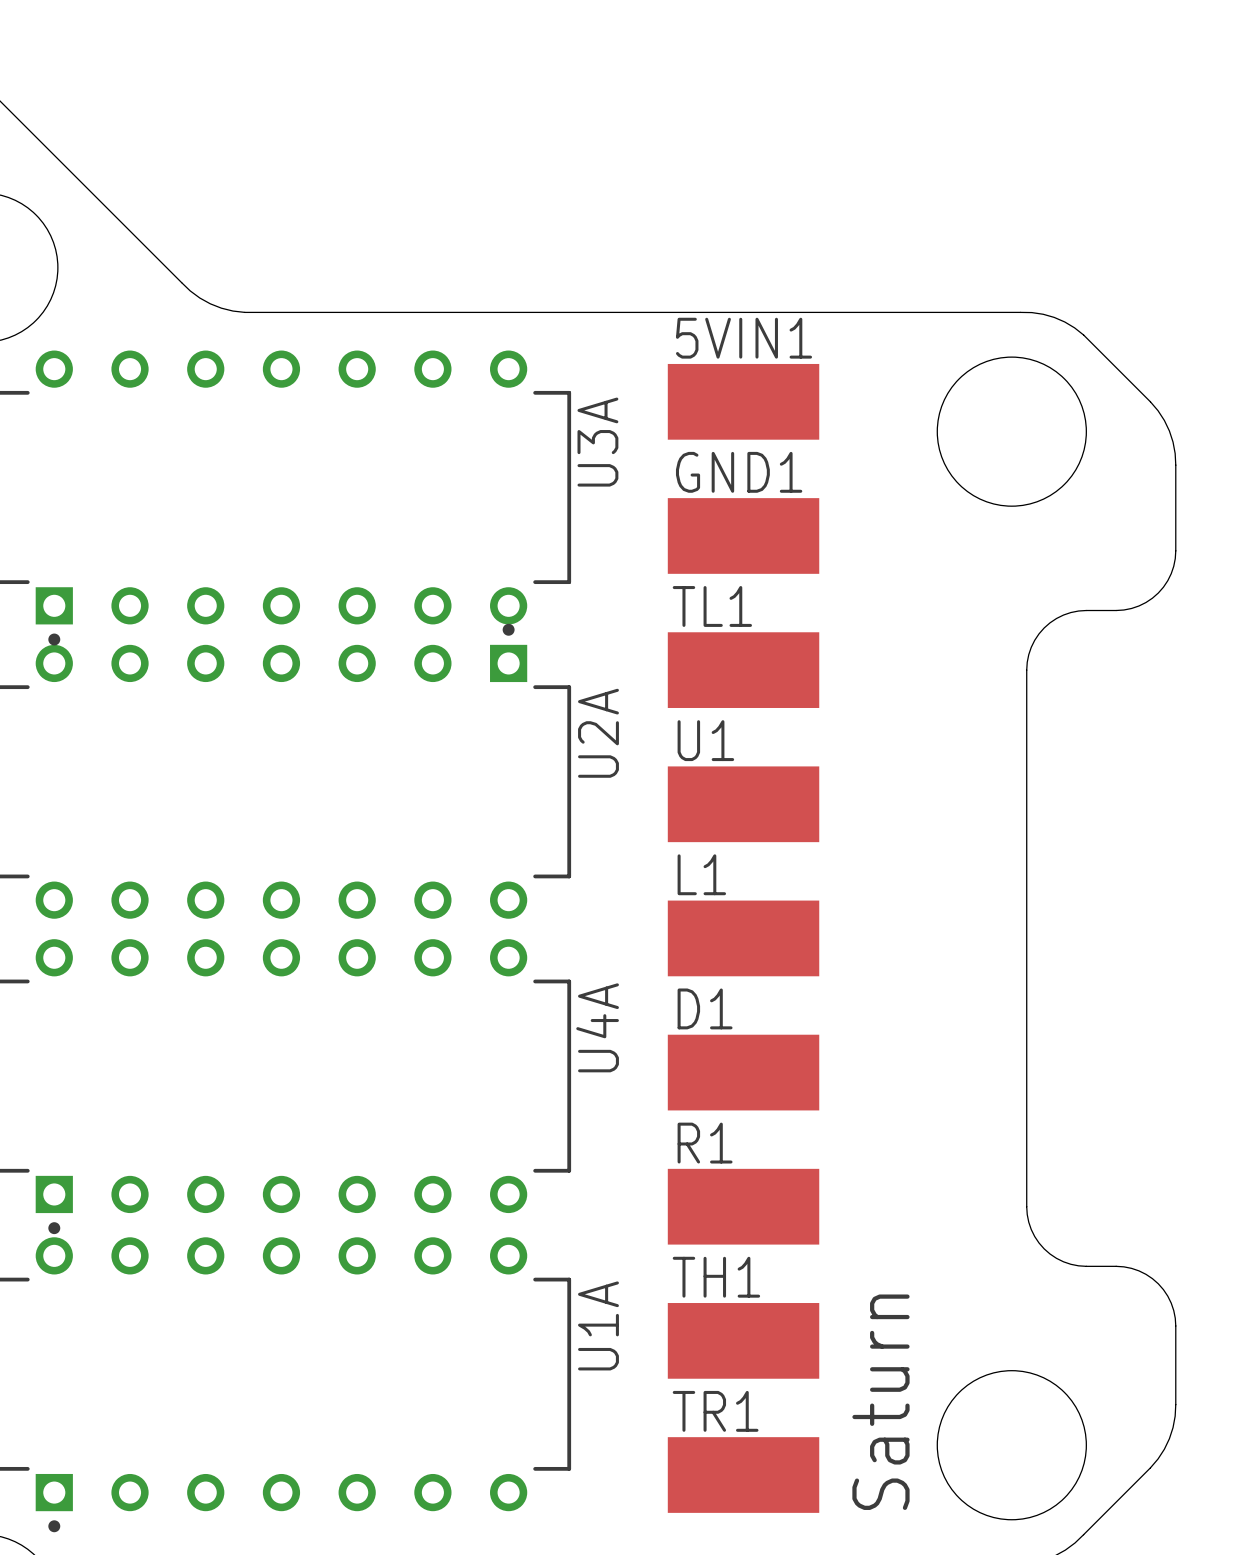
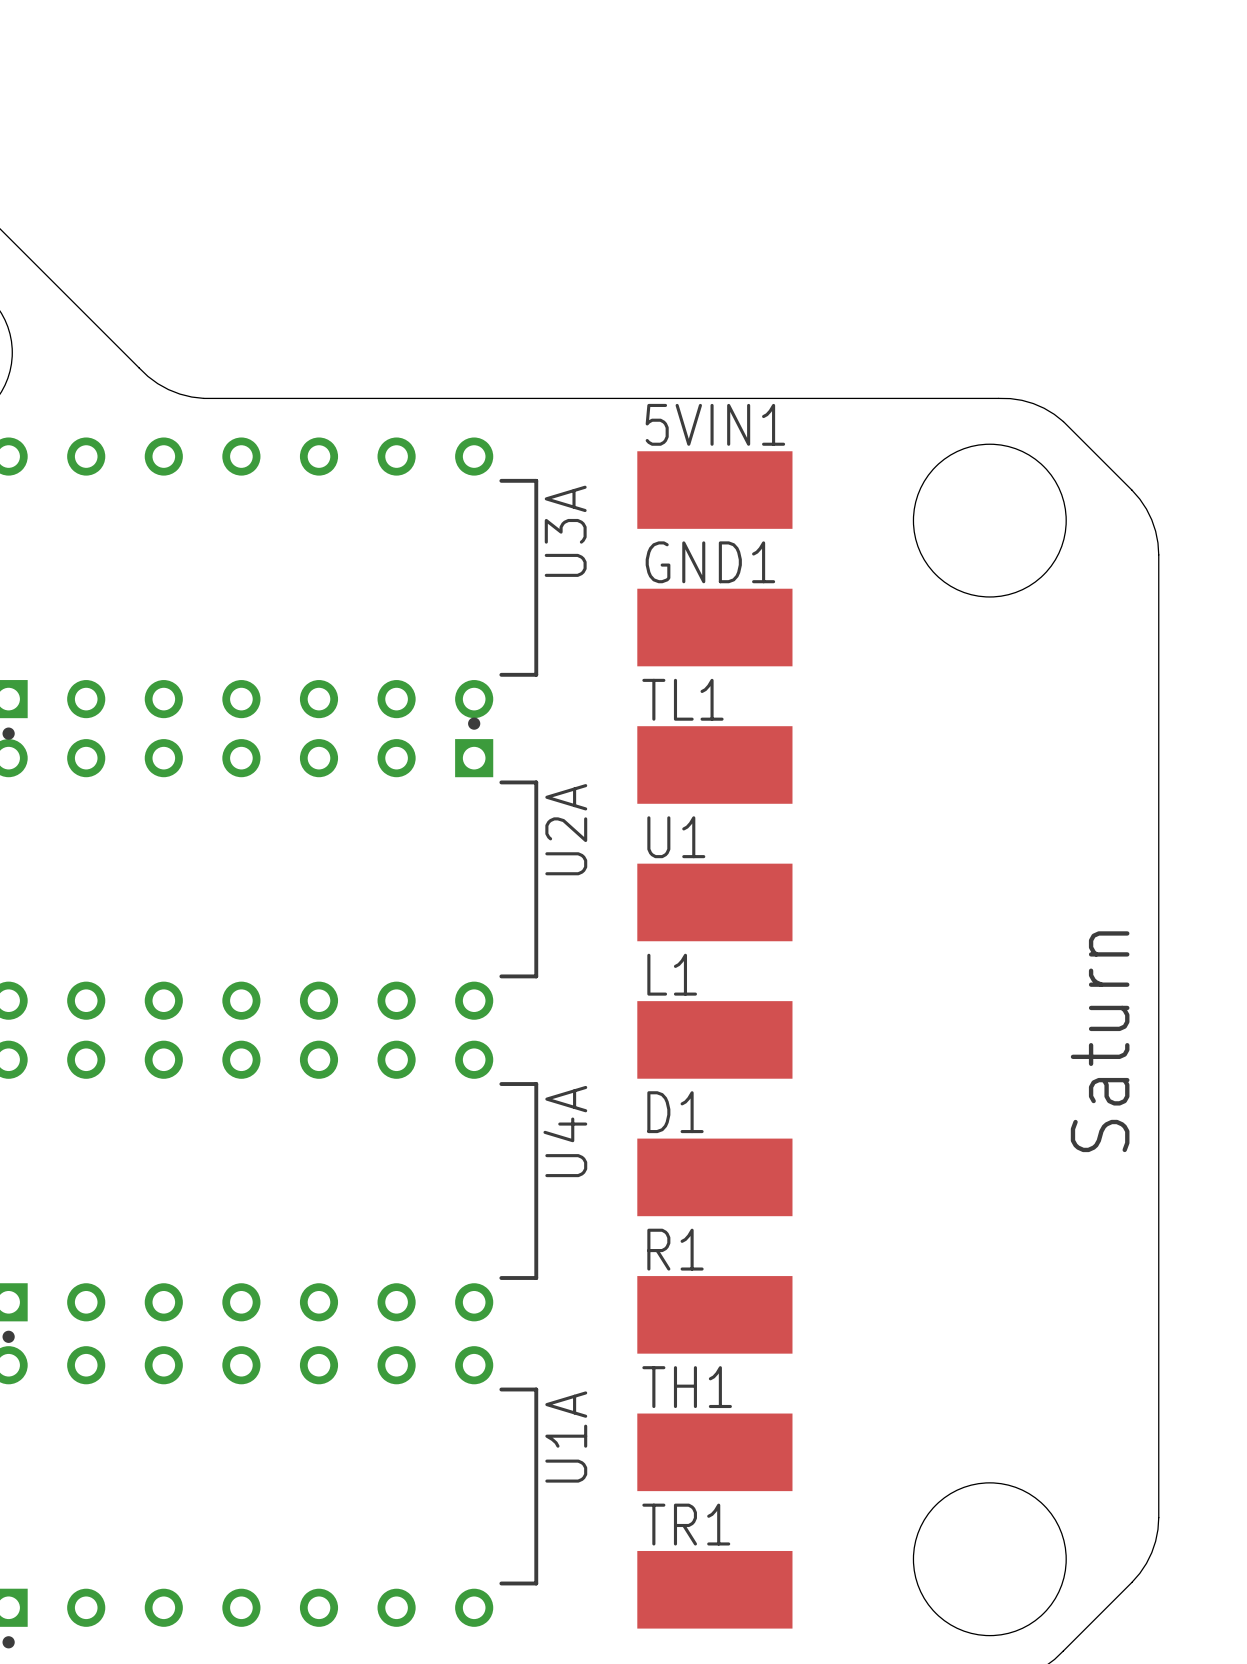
board edge: (1150, 401) (1164, 420) (1173, 442) (1175, 453) (1175, 550) (1171, 573) (1158, 593) (1138, 605) (1123, 610) (1078, 611) (1056, 618) (1044, 627) (1034, 640) (1028, 654) (1026, 670) (1027, 1214) (1034, 1236) (1044, 1248) (1056, 1258) (1078, 1265) (1123, 1266) (1138, 1270) (1158, 1283) (1171, 1303) (1175, 1325) (1175, 1416) (1173, 1427) (1164, 1449) (1150, 1467) -> (1131, 490) (1146, 509) (1151, 519) (1155, 531) (1158, 554) (1158, 1517) (1155, 1541) (1151, 1552) (1146, 1563) (1131, 1582)
text position: Saturn (880, 1402) -> Saturn (1100, 1041)

